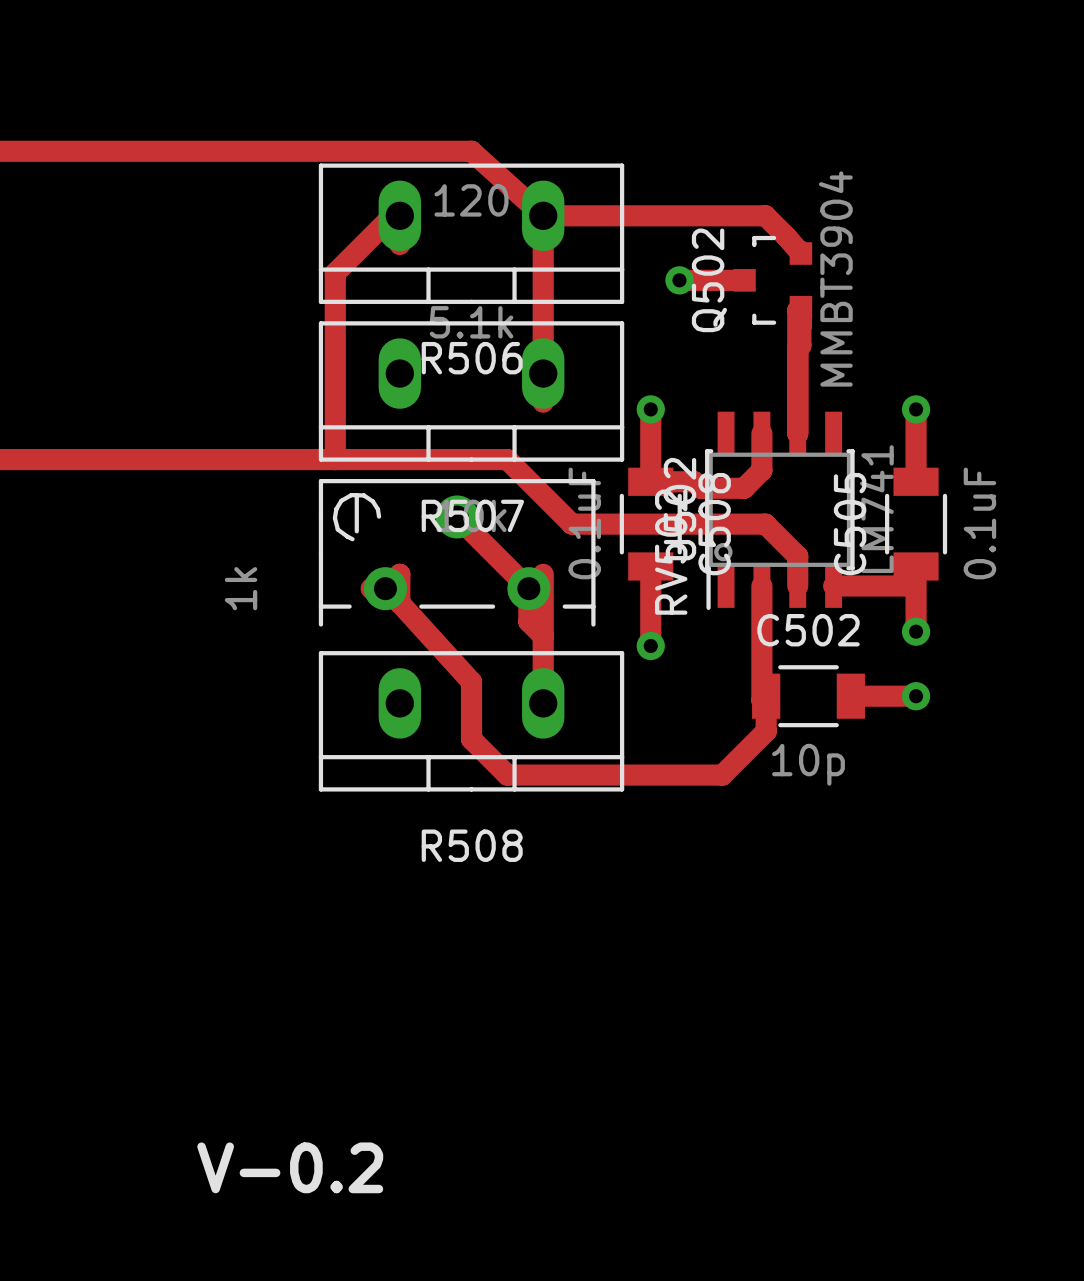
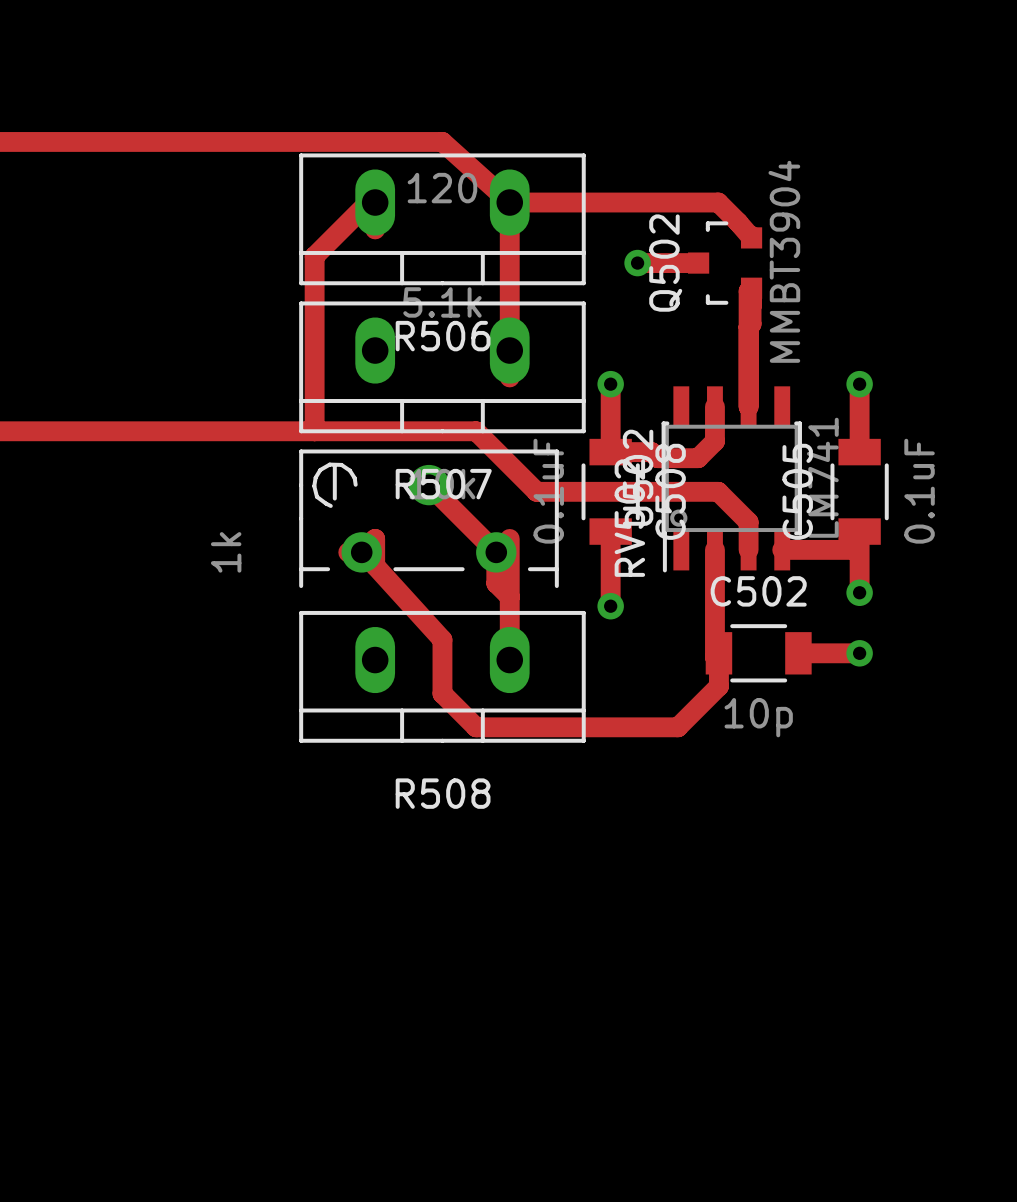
text: V-0.2 (290, 1167) -> none

